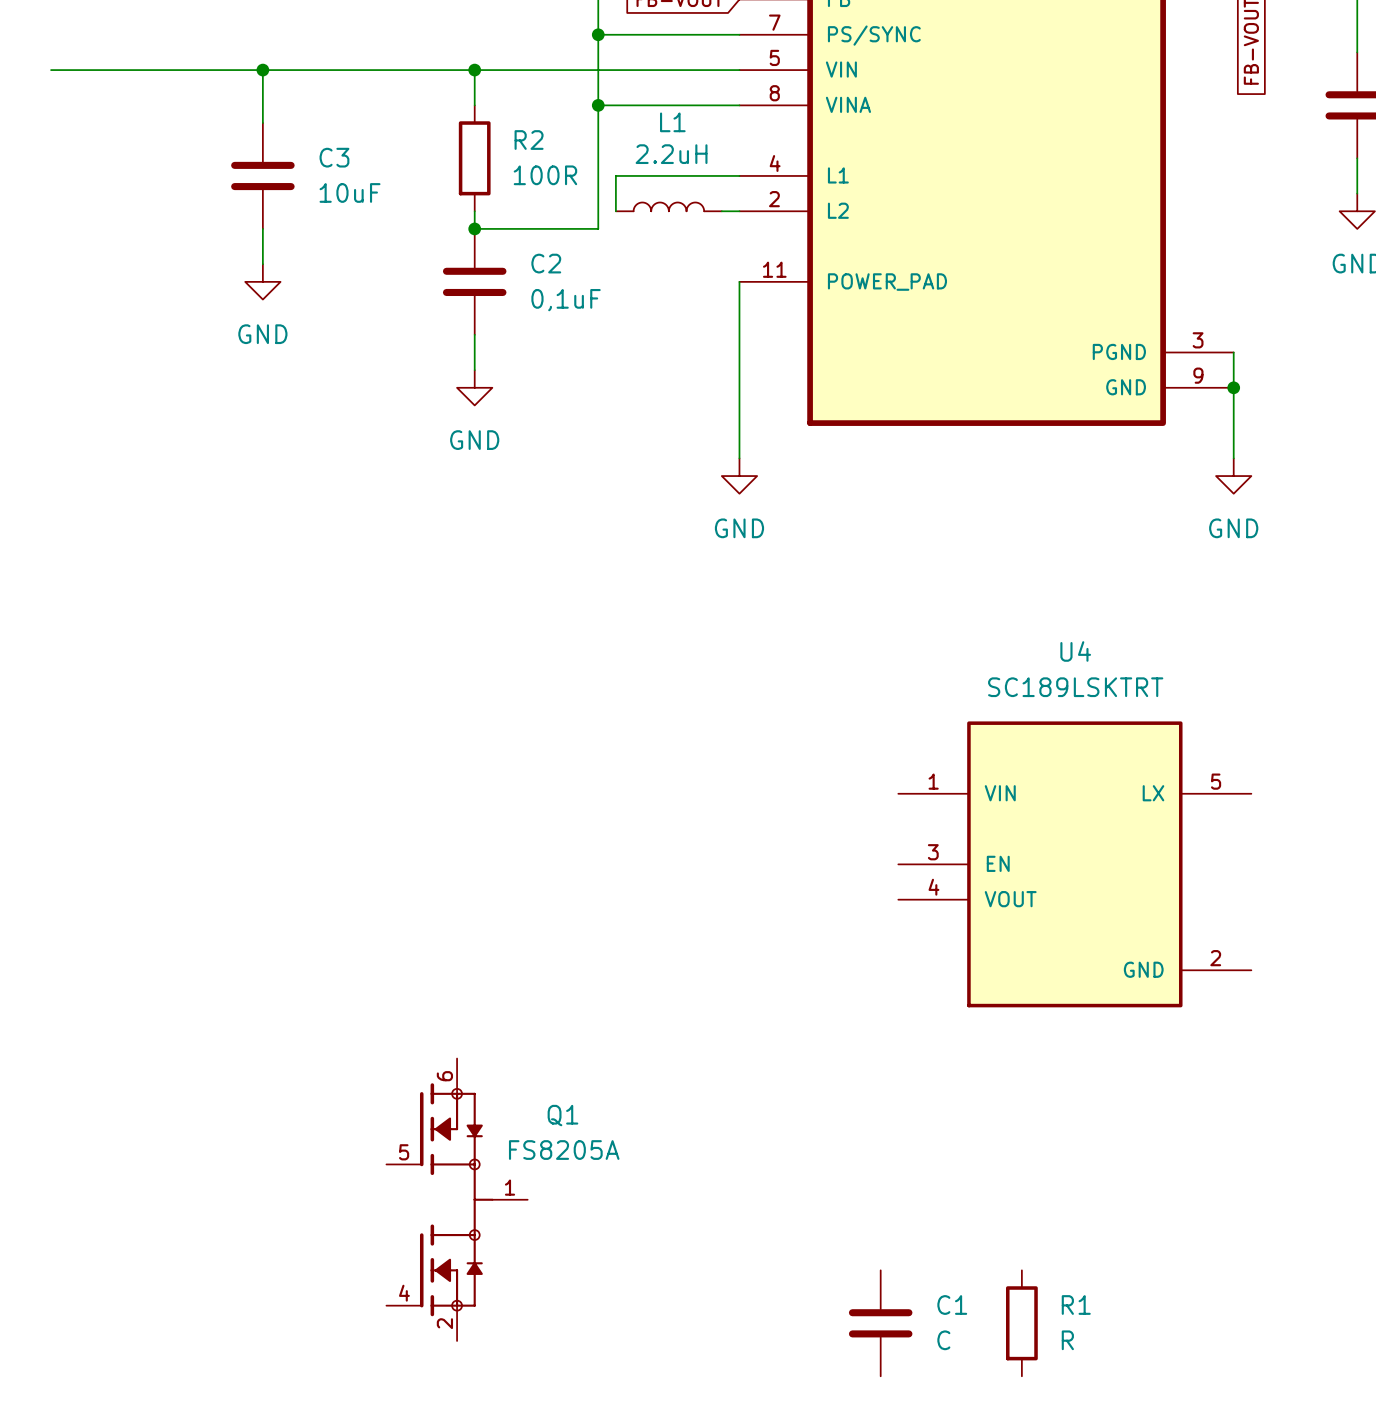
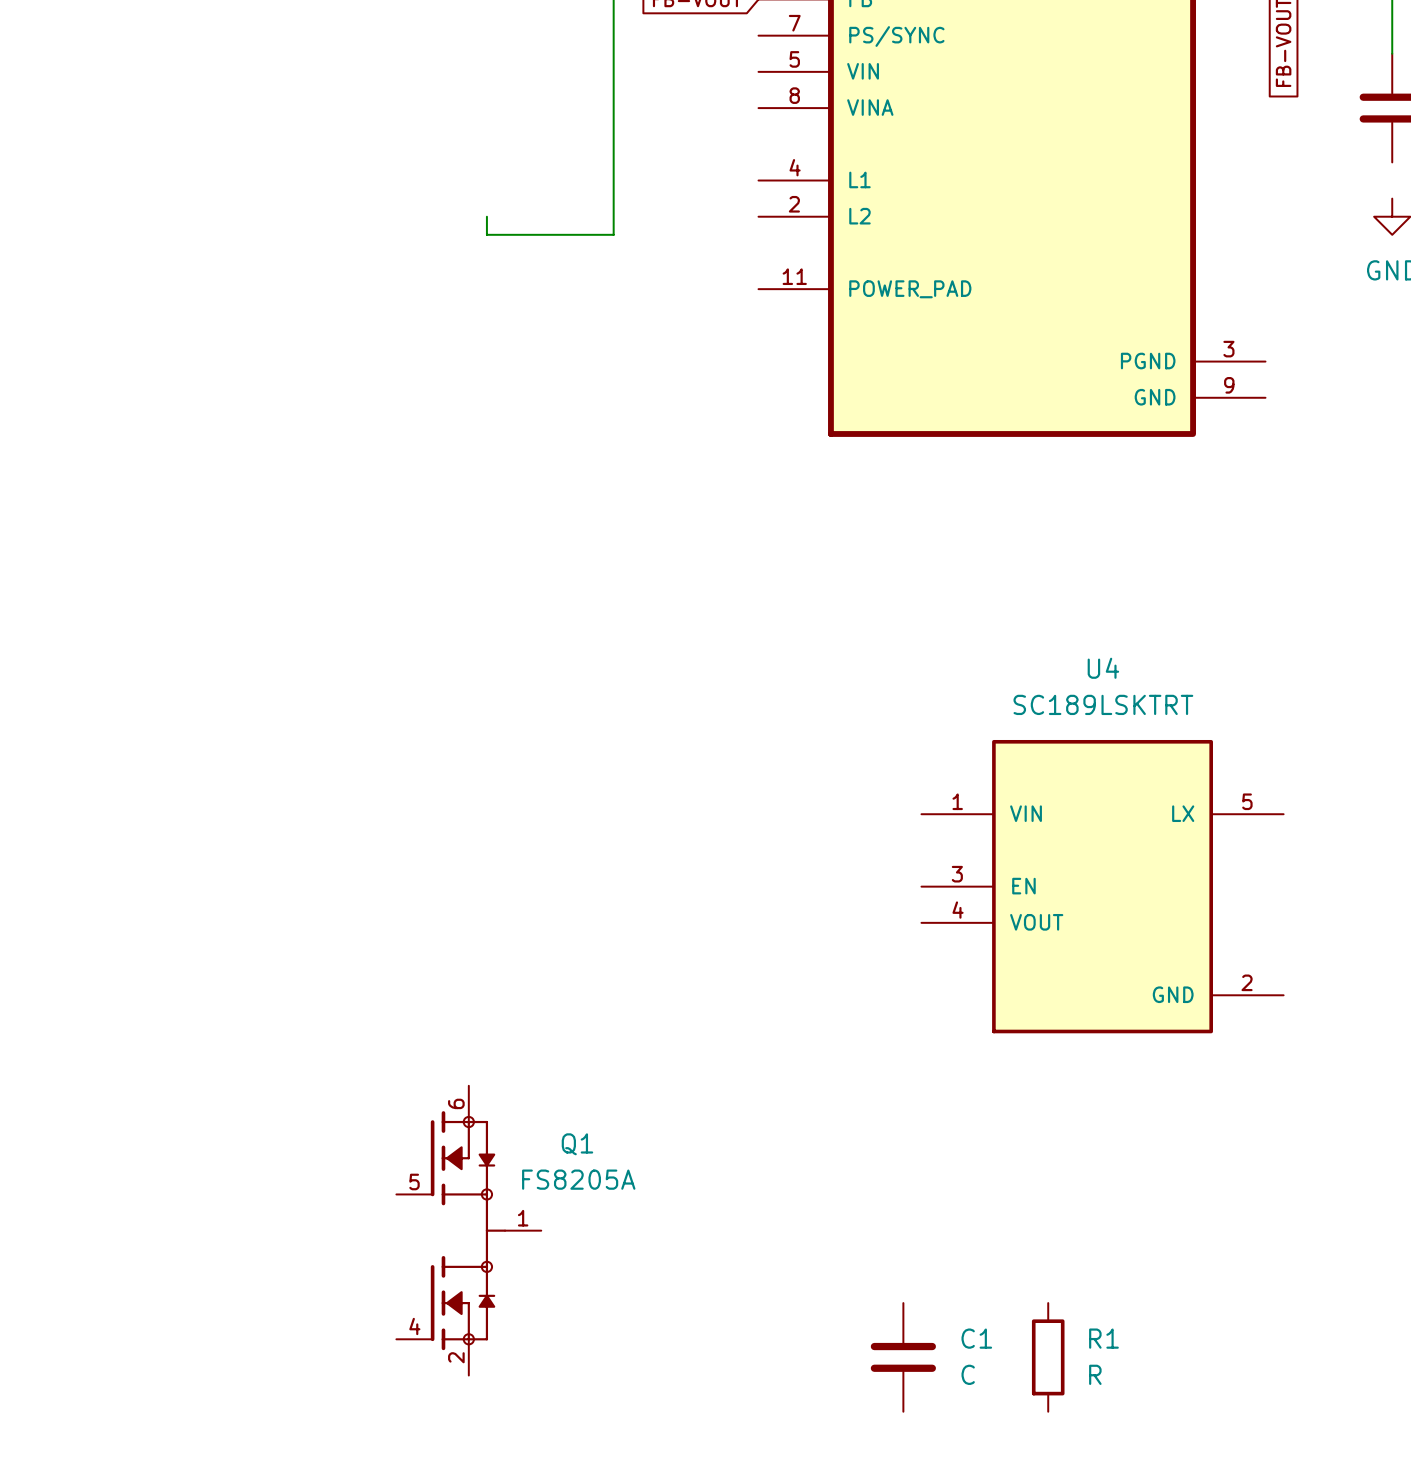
wire: (598, 34) (739, 34) -> none
junction: (598, 34) -> none
wire: (51, 70) (739, 70) -> none
wire: (262, 70) (262, 123) -> none
junction: (262, 70) -> none
wire: (474, 70) (474, 105) -> none
junction: (474, 70) -> none
wire: (598, 105) (739, 105) -> none
junction: (598, 105) -> none
R2: 100R (474, 158) -> none
wire: (1357, 158) (1357, 193) -> none
C3: 10uF (262, 175) -> none
wire: (739, 175) (615, 175) (615, 211) -> none
L1: 2.2uH (668, 206) -> none
wire: (721, 211) (739, 211) -> none
wire: (262, 228) (262, 264) -> none
junction: (474, 228) -> none
power symbol: GND (262, 281) -> none
C2: 0,1uF (474, 281) -> none
wire: (739, 281) (739, 458) -> none
wire: (474, 334) (474, 370) -> none
wire: (1233, 352) (1233, 458) -> none
power symbol: GND (474, 387) -> none
junction: (1233, 387) -> none
power symbol: GND (739, 476) -> none
power symbol: GND (1233, 476) -> none

